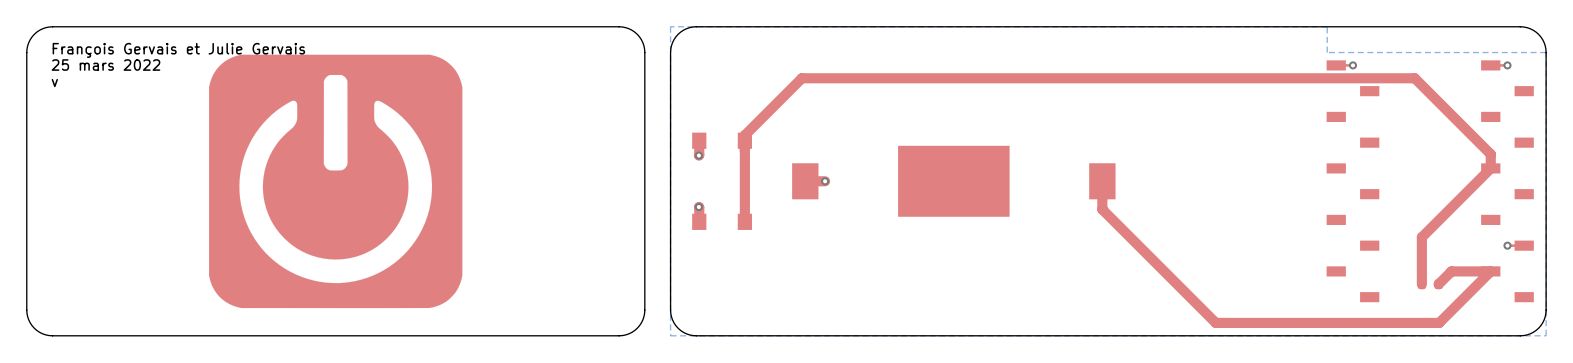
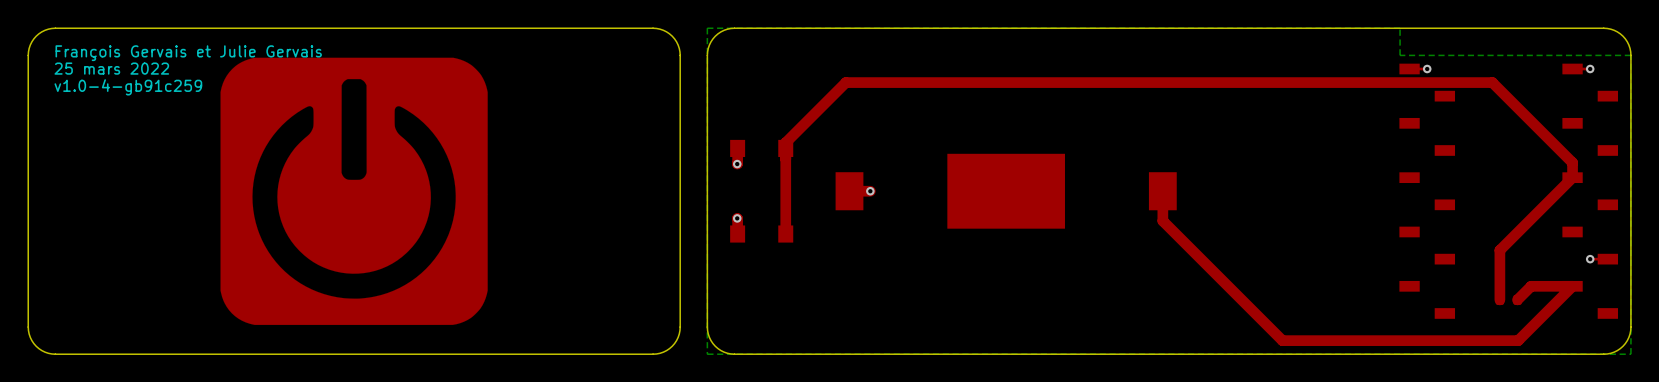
text: v (54, 83) -> v1.0-4-gb91c259 (128, 87)

